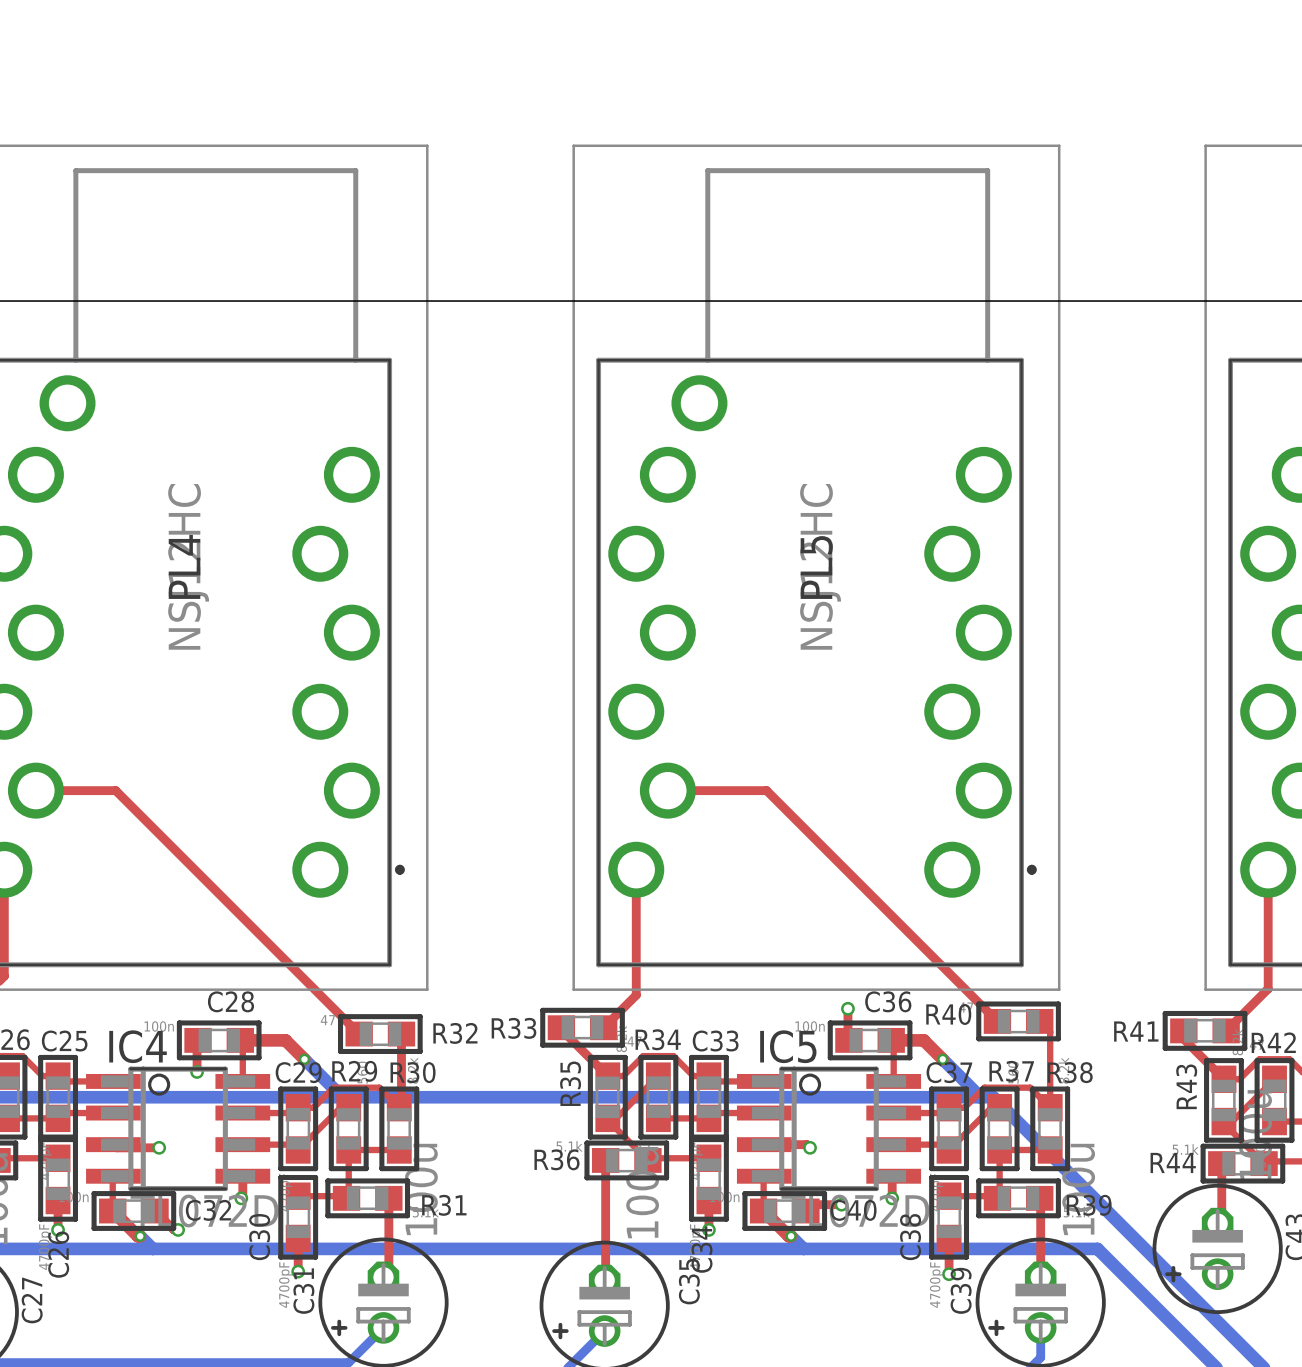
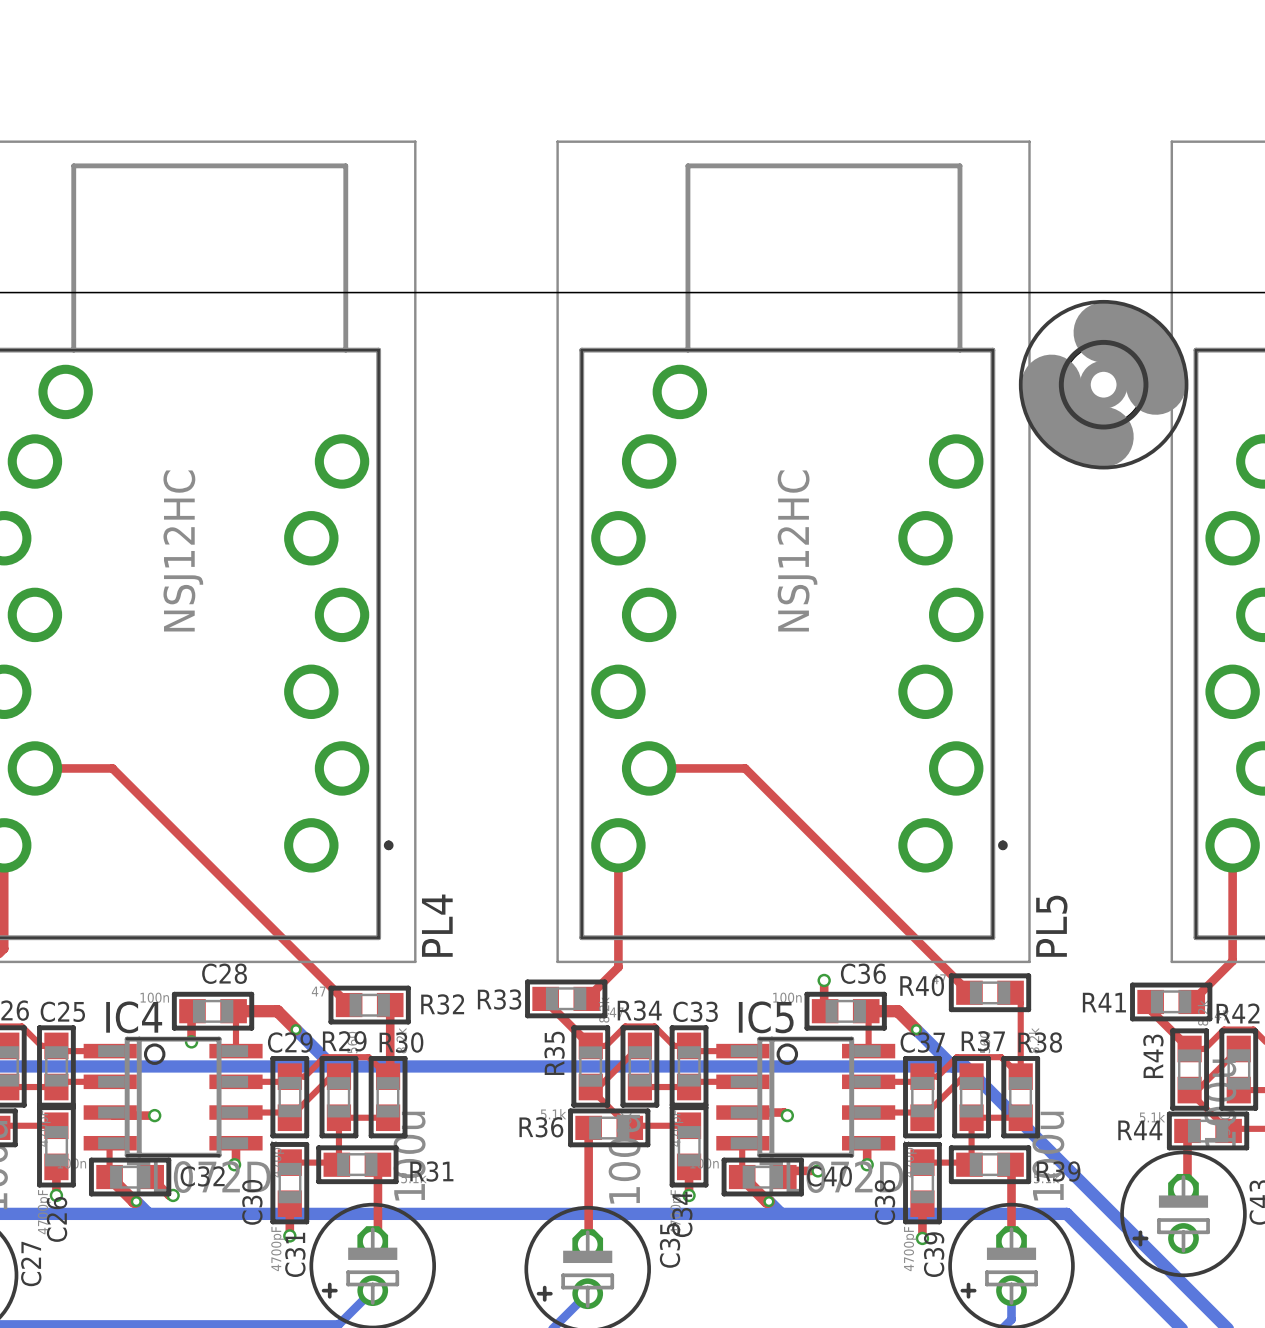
part: none -> (1103, 384)
PL4 name position: PL4 (184, 566) -> PL4 (437, 925)
PL5 name position: PL5 (816, 567) -> PL5 (1051, 926)

